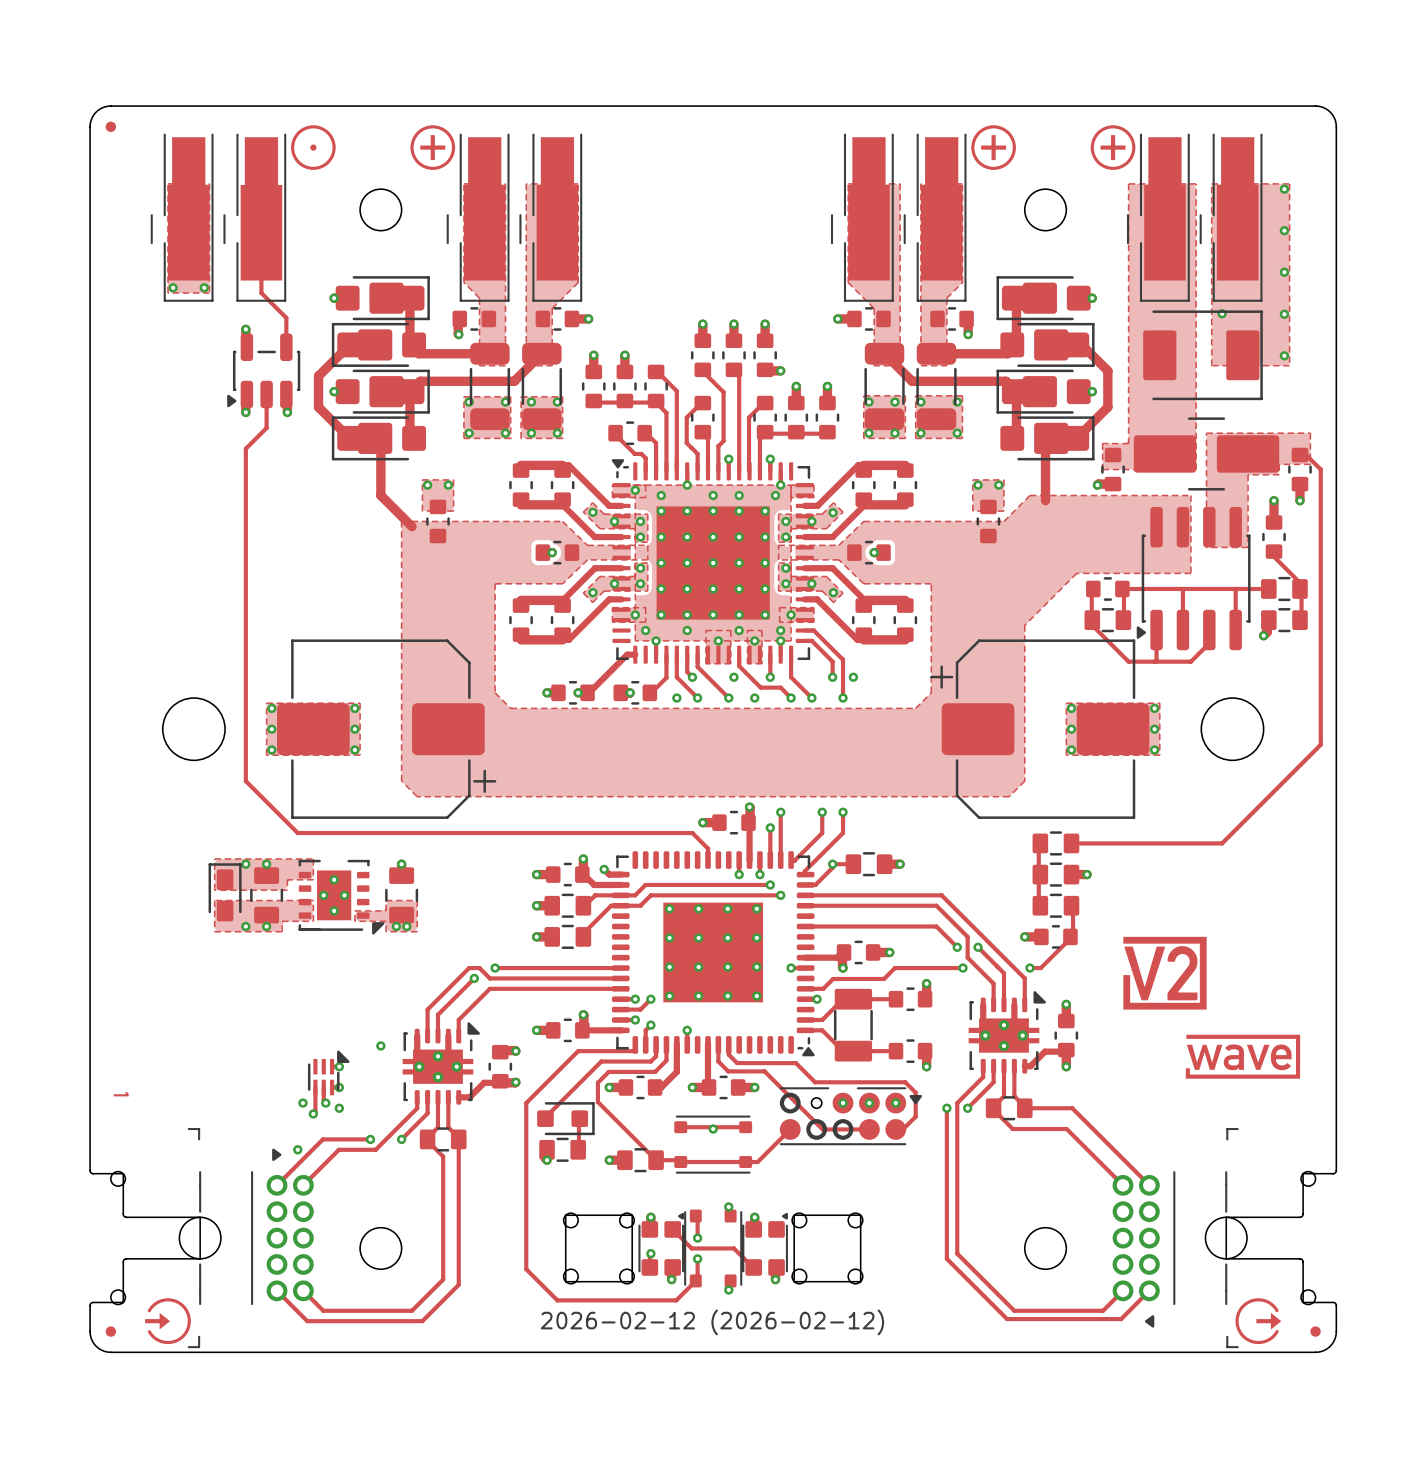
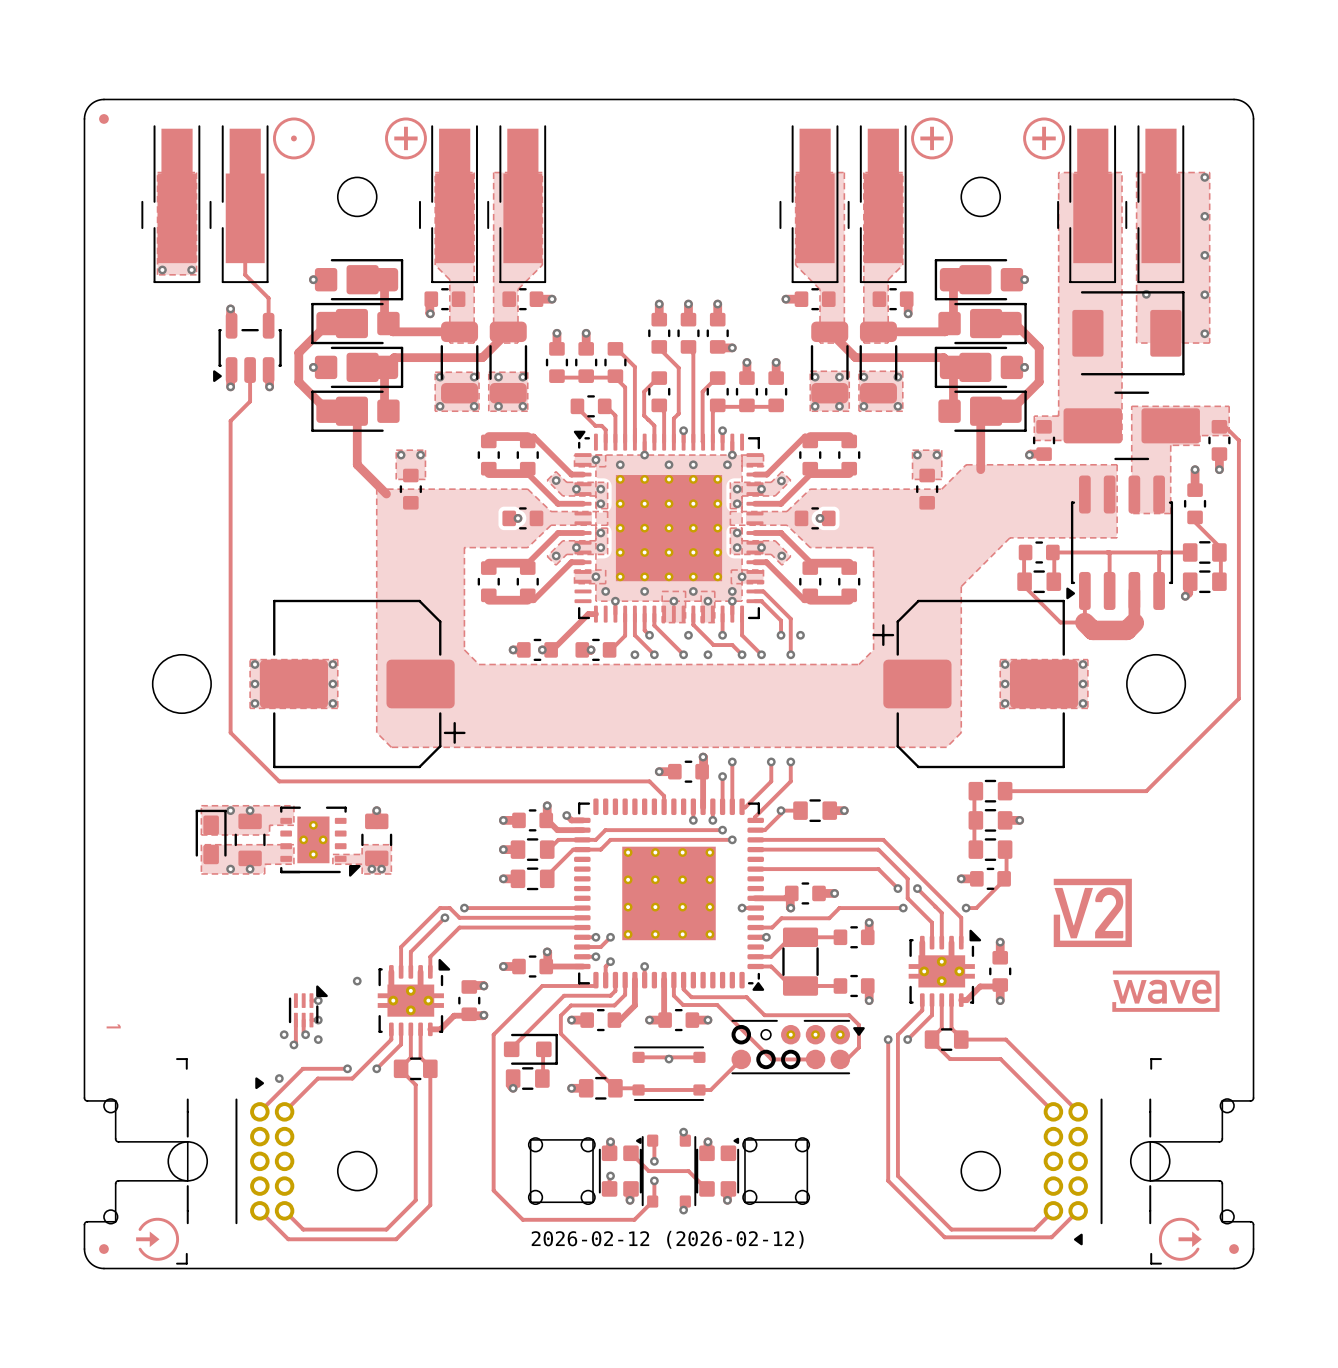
track: (1209, 643) (1190, 661) (1128, 661) -> (1134, 590) (1134, 622) (1126, 630) (1092, 630) (1084, 622) (1060, 622) (1058, 620)

